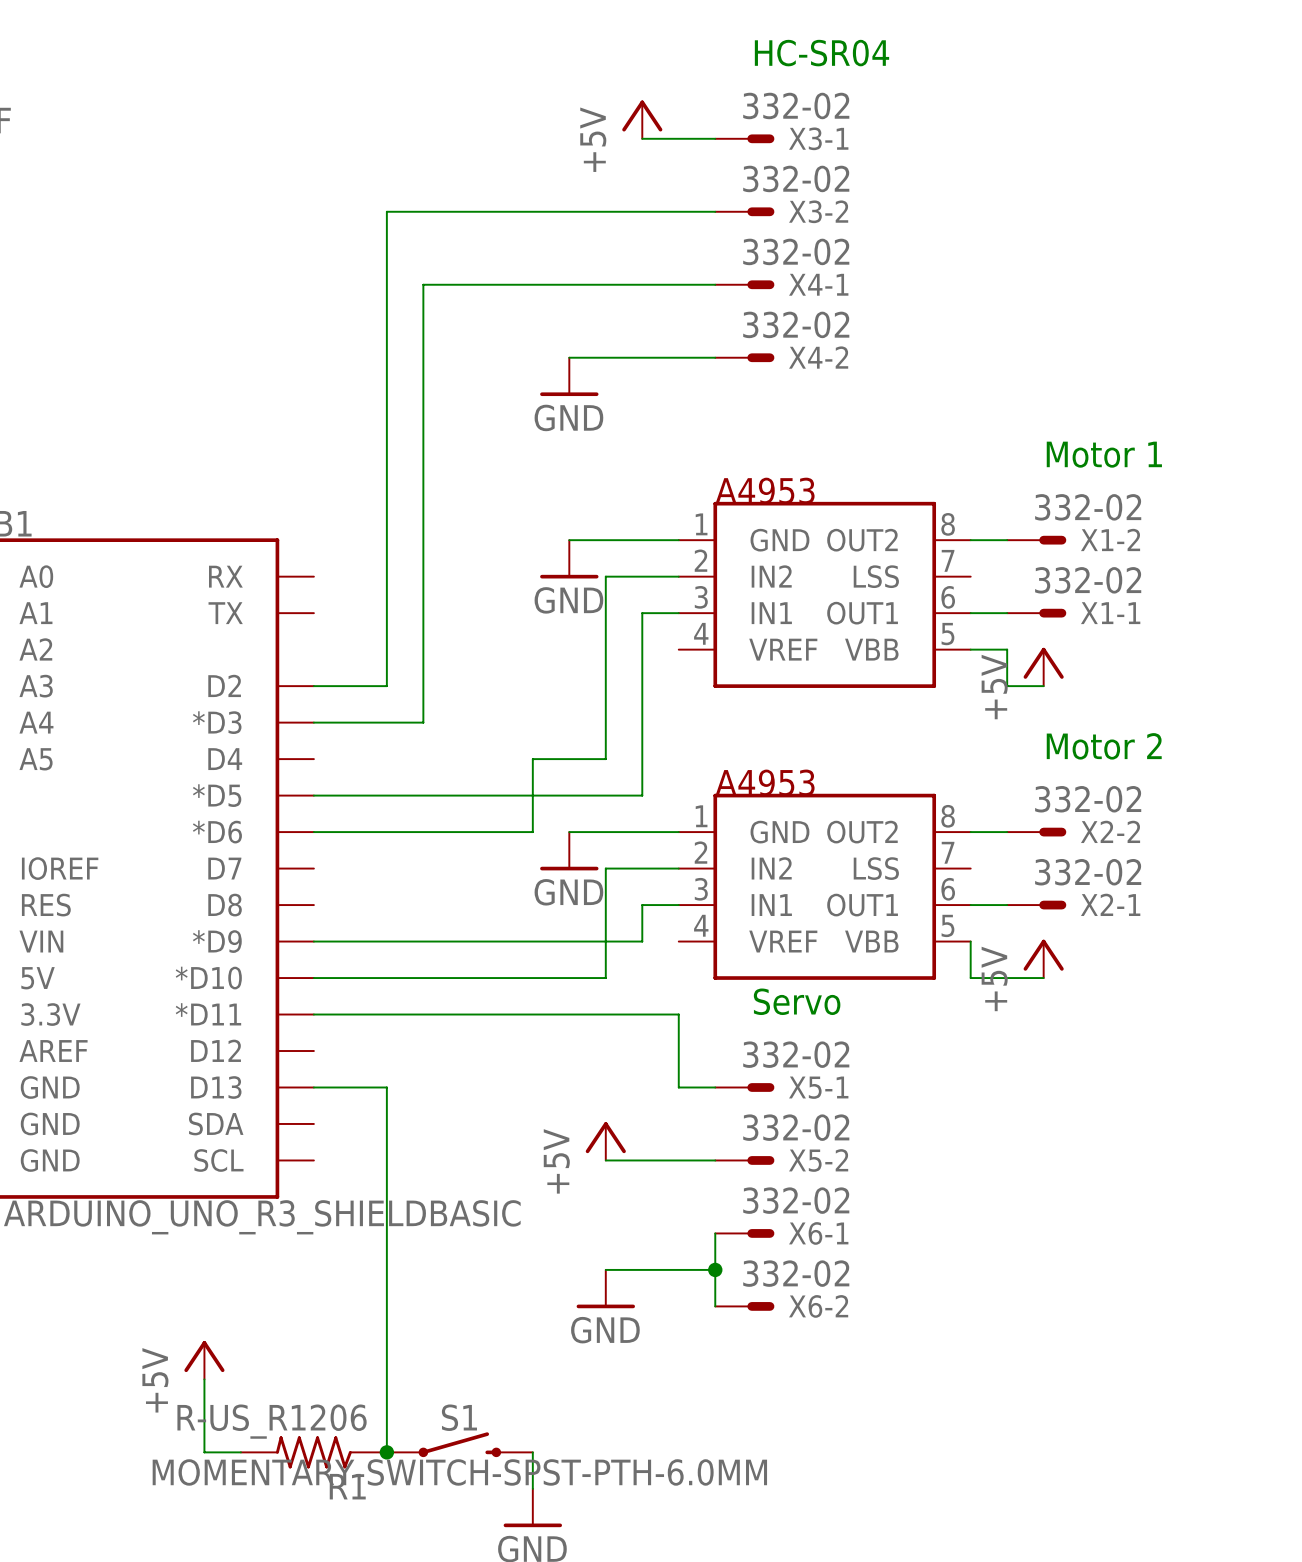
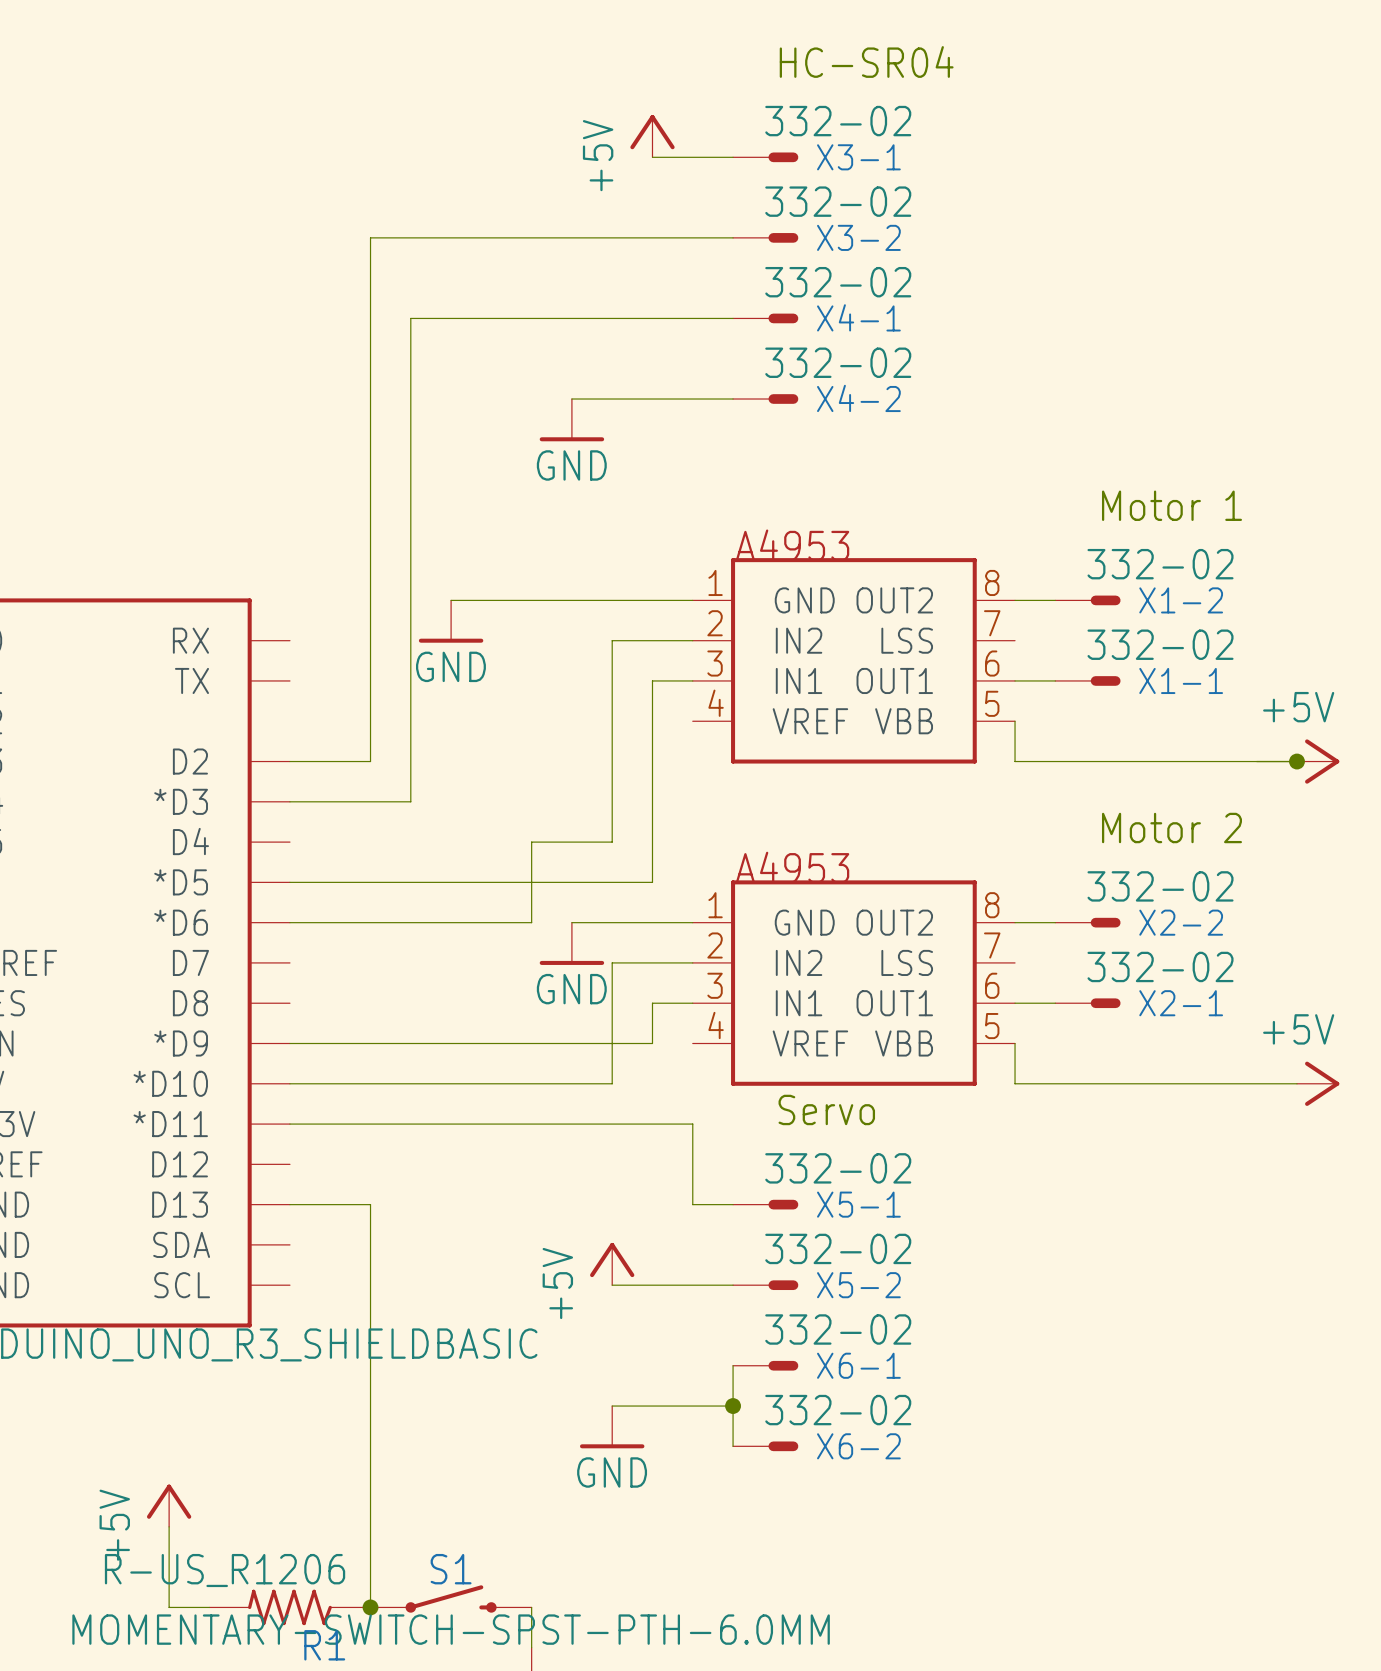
wire: none -> (451, 600) (571, 600)
power symbol position: GND (569, 559) -> GND (451, 621)
wire: (970, 649) (1007, 649) (1007, 686) -> (1015, 721) (1015, 761) (1055, 761)
power symbol: +5V (1043, 666) -> none
wire: none -> (1095, 761) (1296, 761)
junction: none -> (1296, 761)
power symbol: none -> +5V (1318, 761)
power symbol: +5V (1043, 958) -> none
wire: none -> (1095, 1083) (1296, 1083)
power symbol: none -> +5V (1318, 1083)

